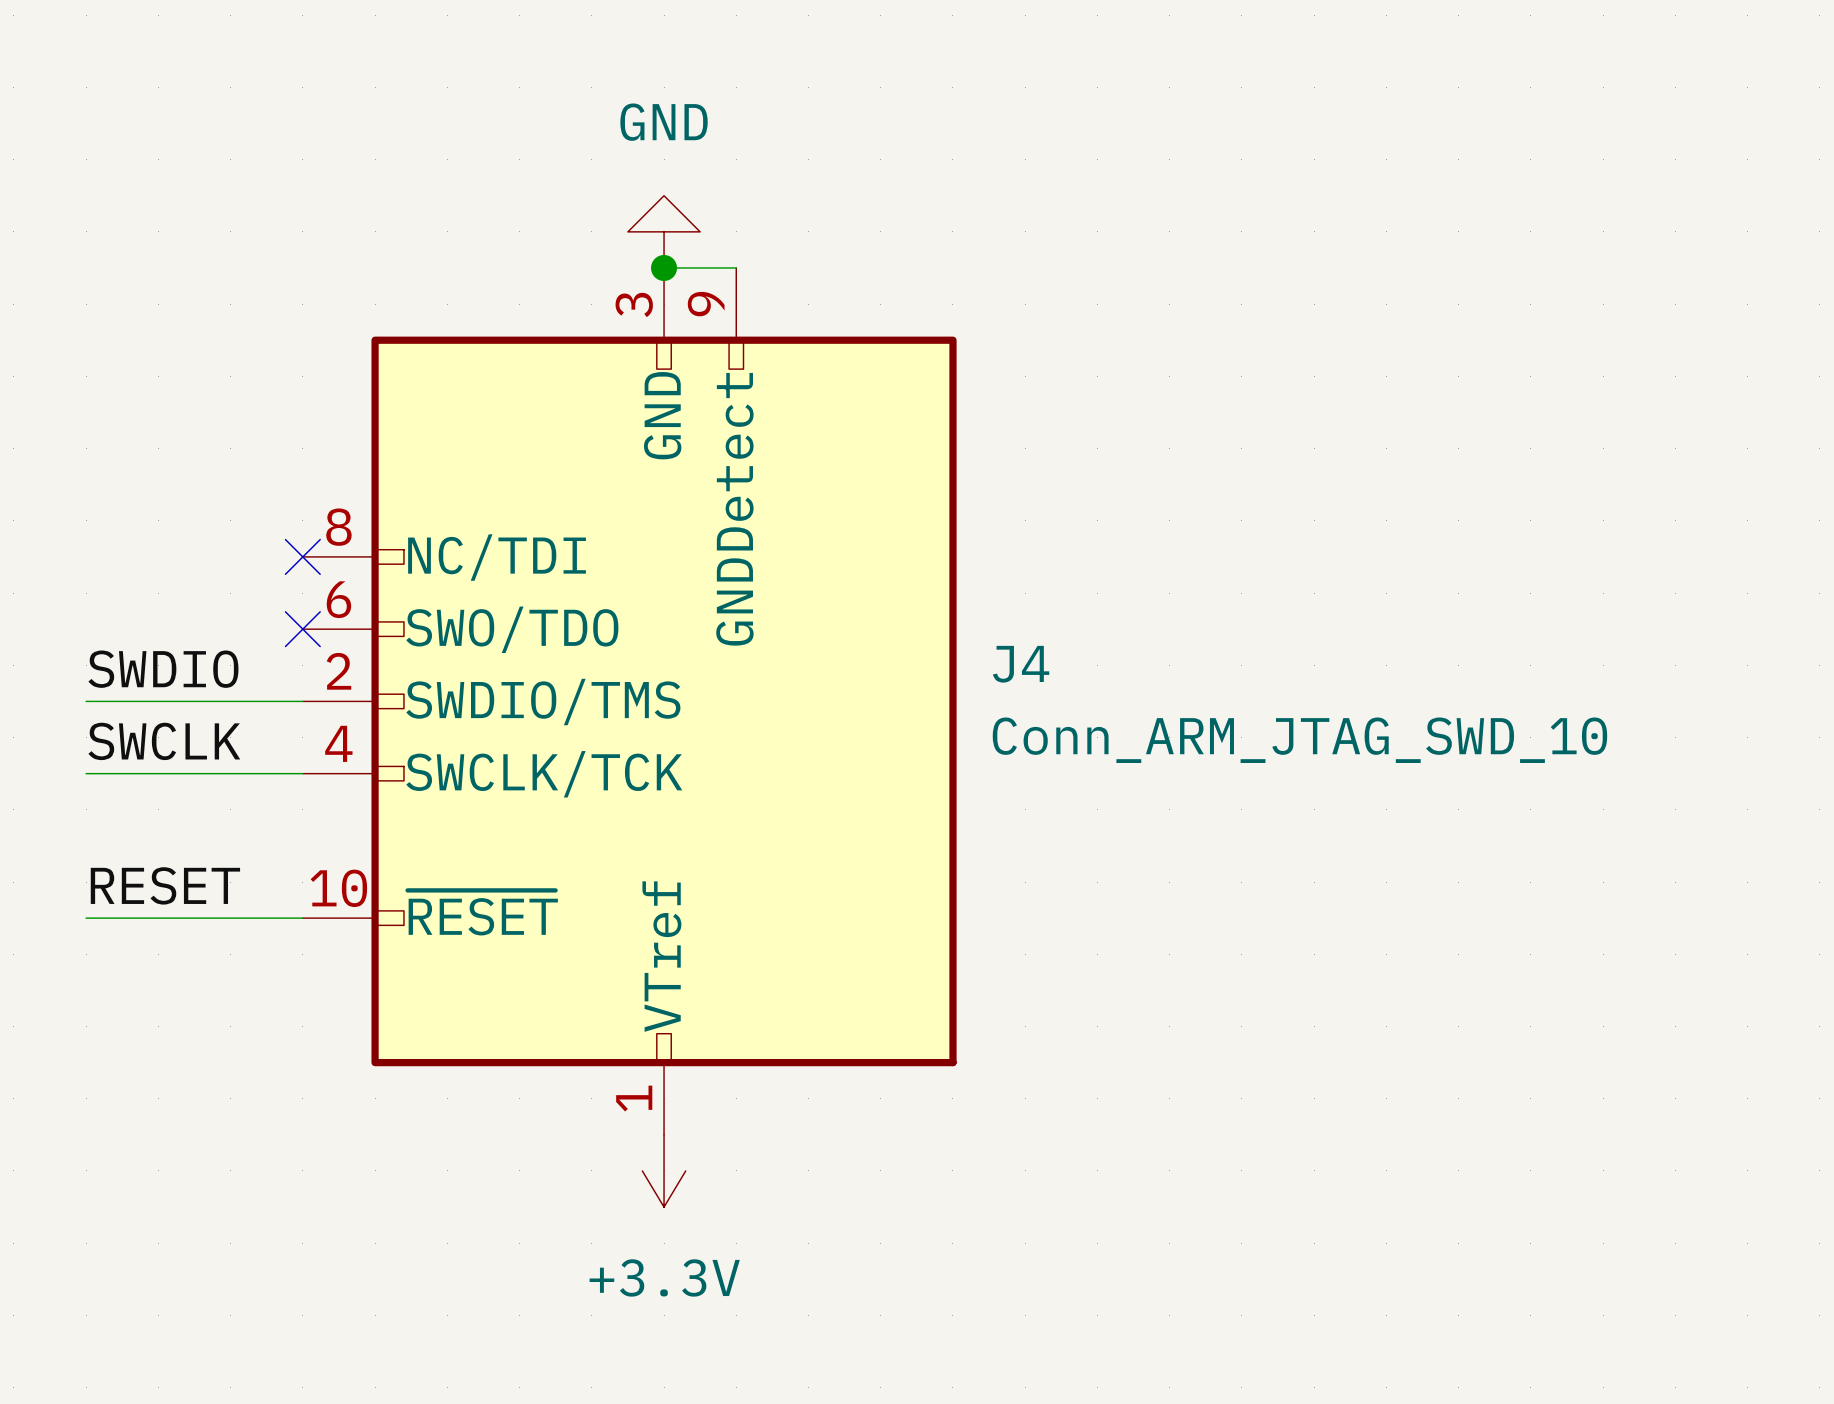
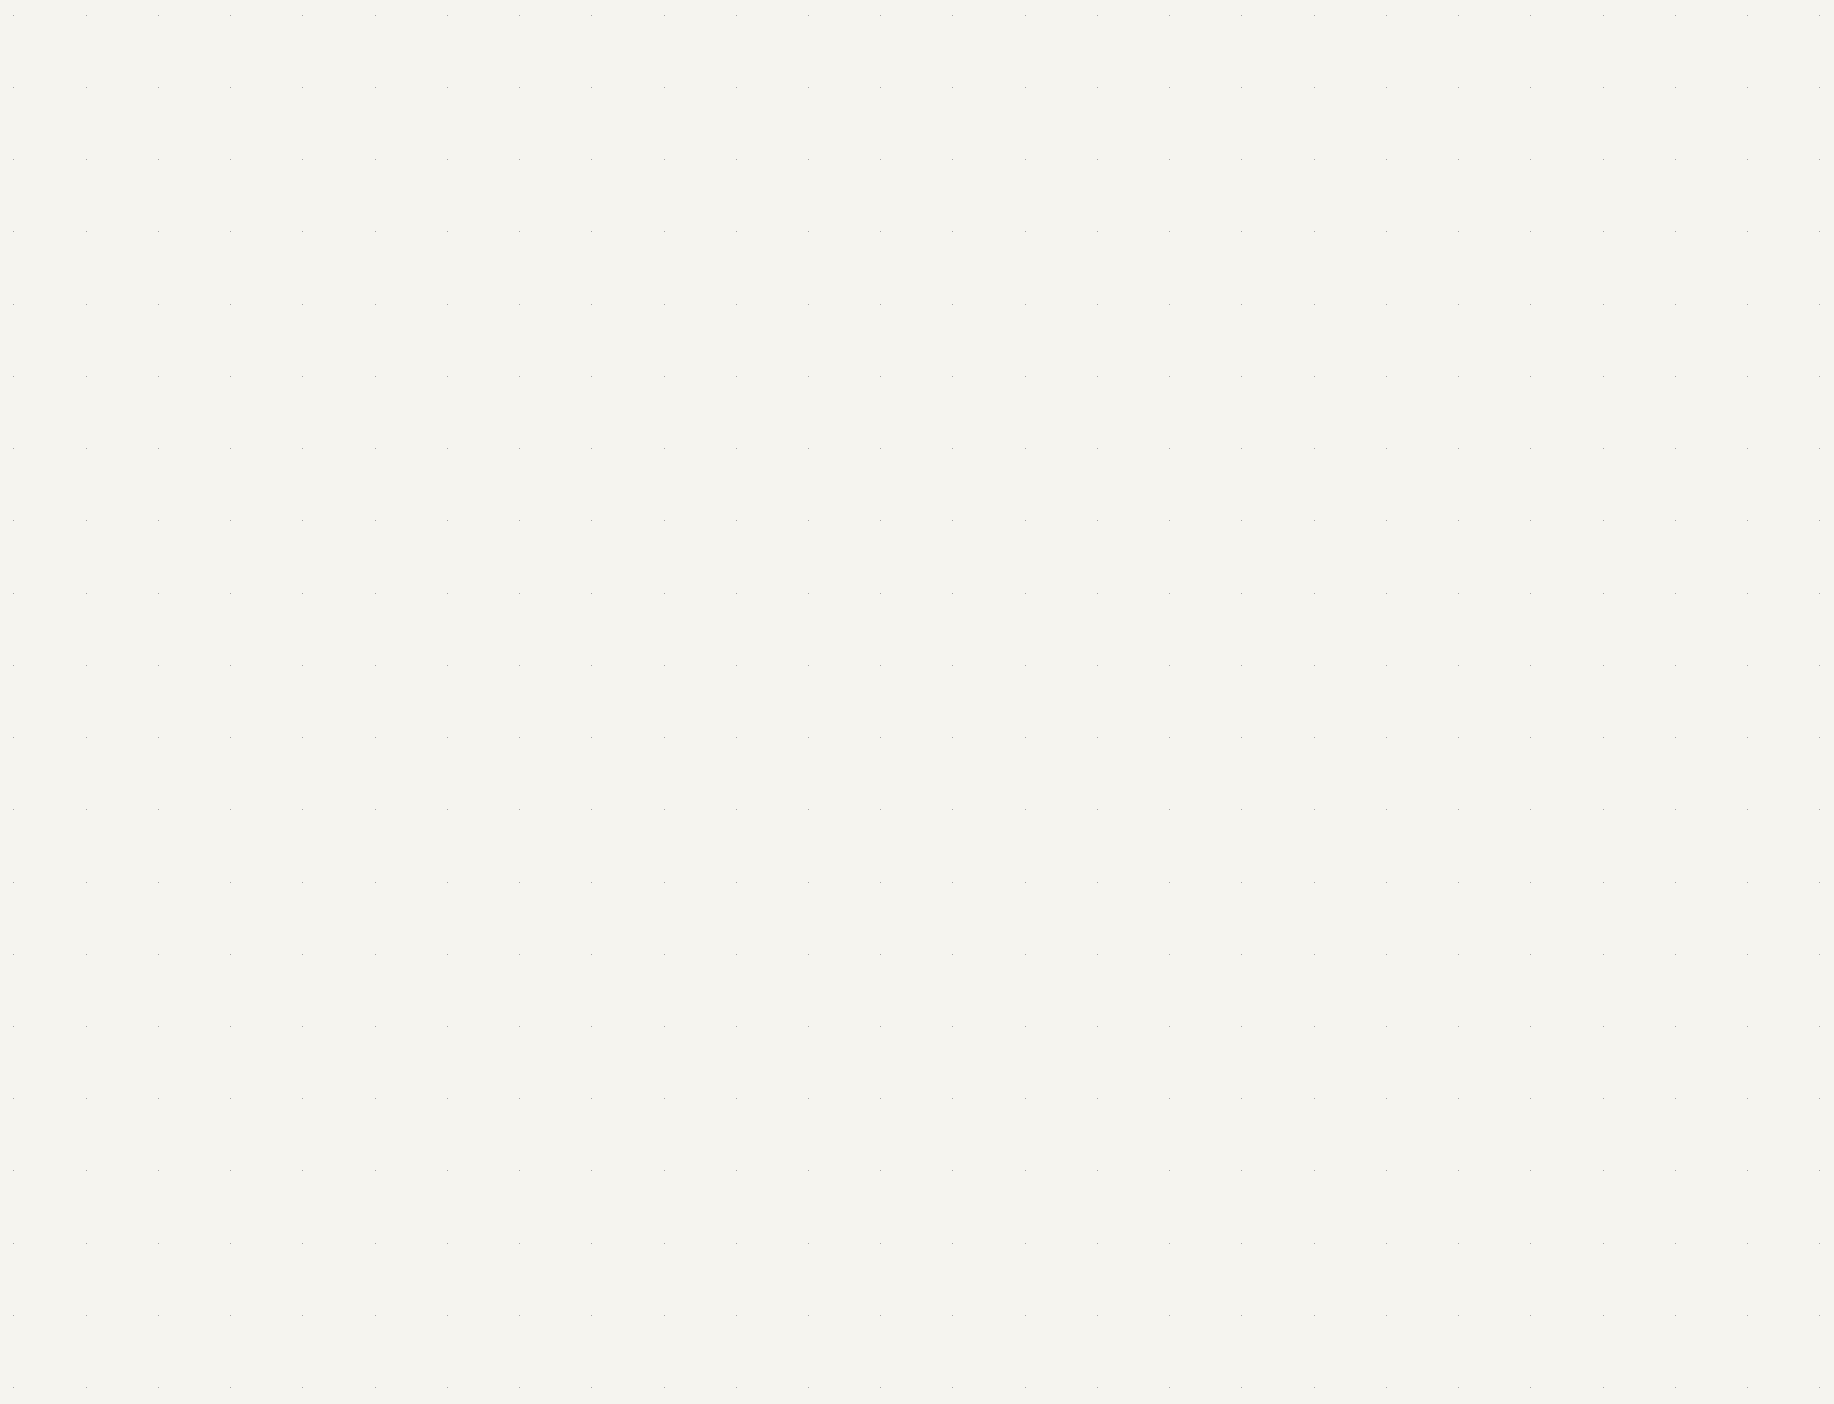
power symbol: GND (664, 231) -> none
wire: (664, 267) (736, 267) -> none
junction: (664, 267) -> none
no-connect mark: (302, 556) -> none
no-connect mark: (302, 629) -> none
label: SWDIO (163, 669) -> none
wire: (86, 701) (302, 701) -> none
J4: Conn_ARM_JTAG_SWD_10 (629, 701) -> none
label: SWCLK (164, 741) -> none
wire: (86, 773) (302, 773) -> none
label: RESET (165, 885) -> none
wire: (86, 918) (302, 918) -> none
power symbol: +3.3V (664, 1170) -> none

